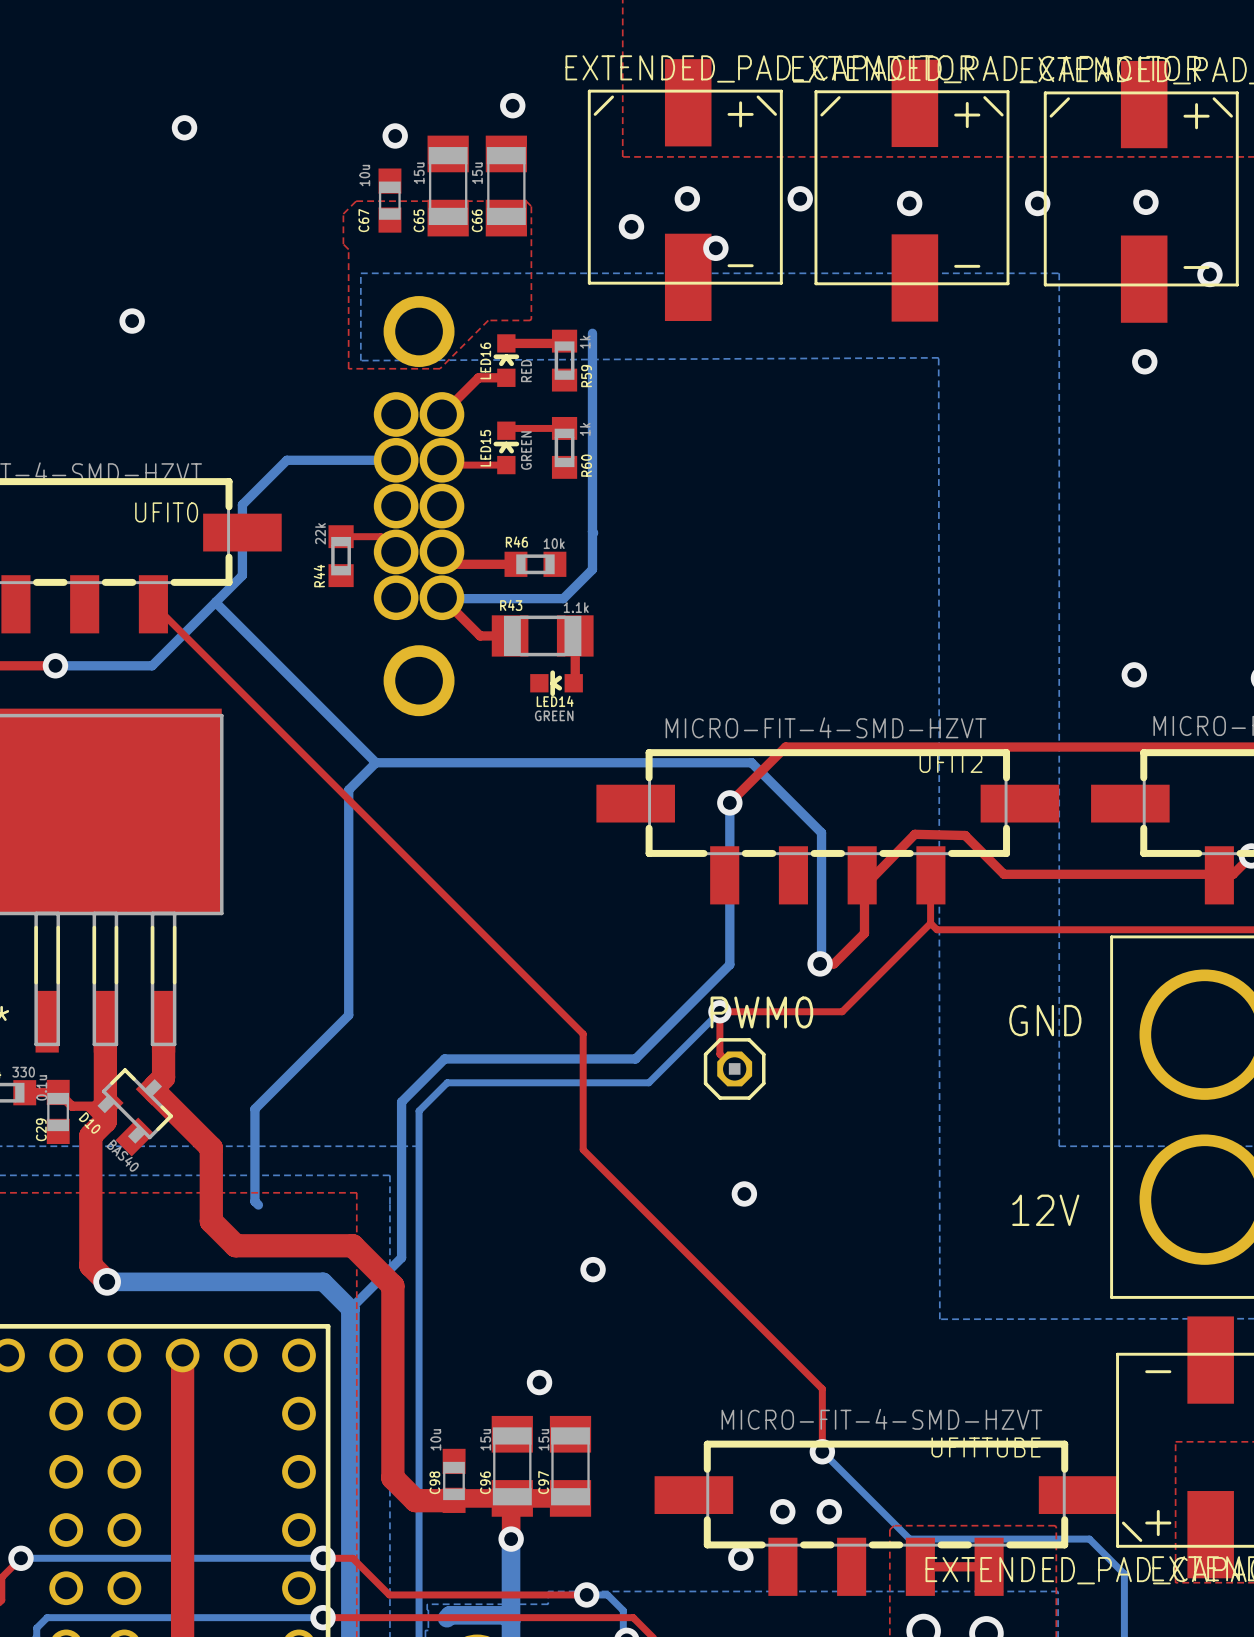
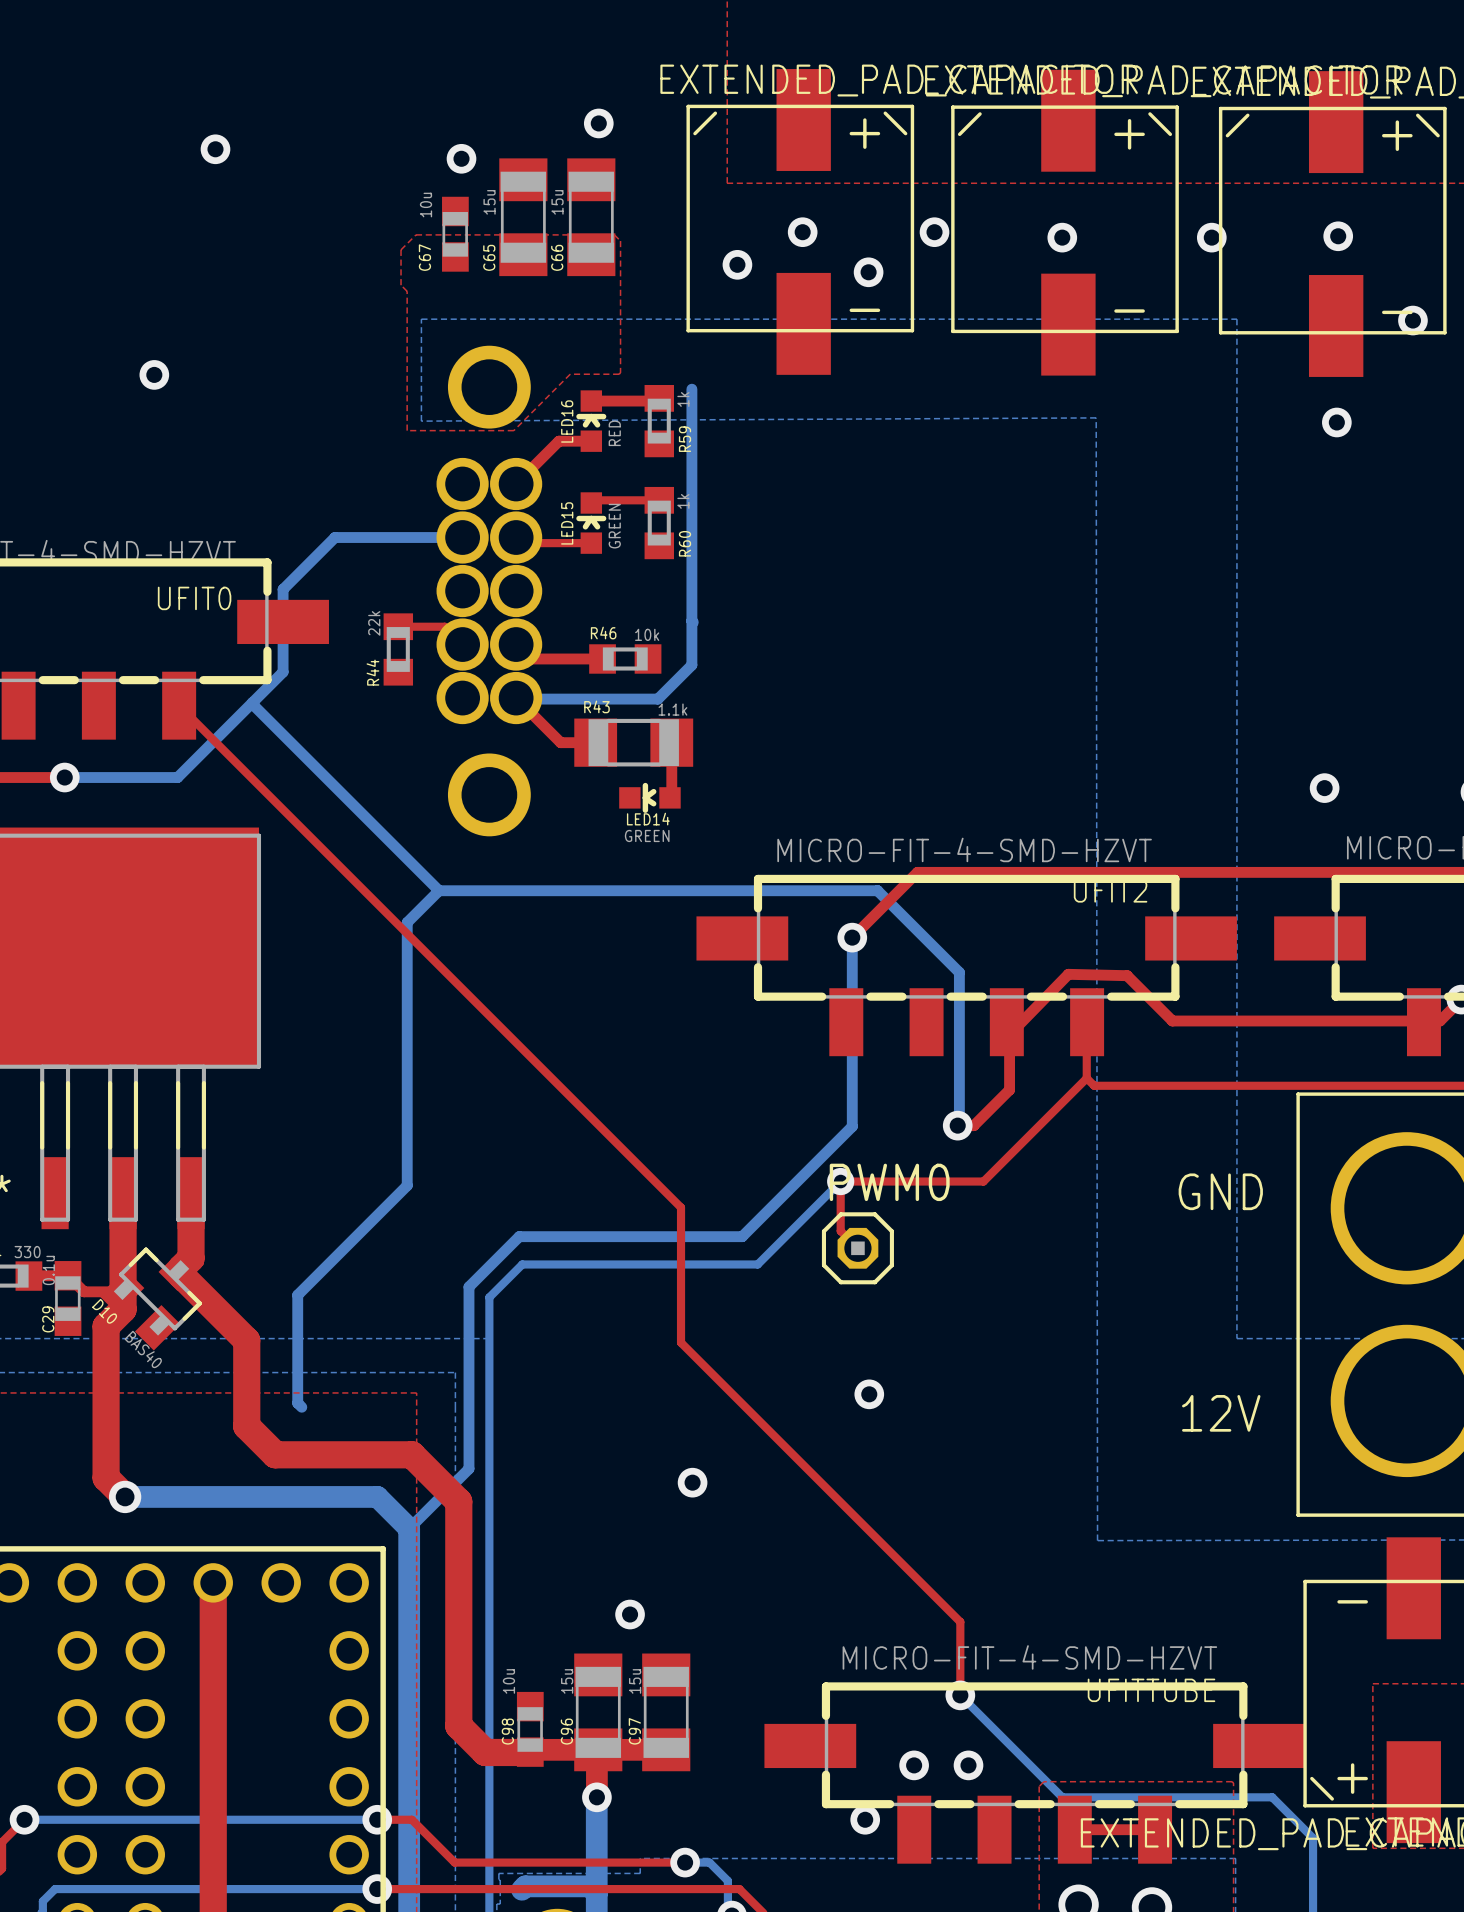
via position: (715, 248) -> (868, 272)

